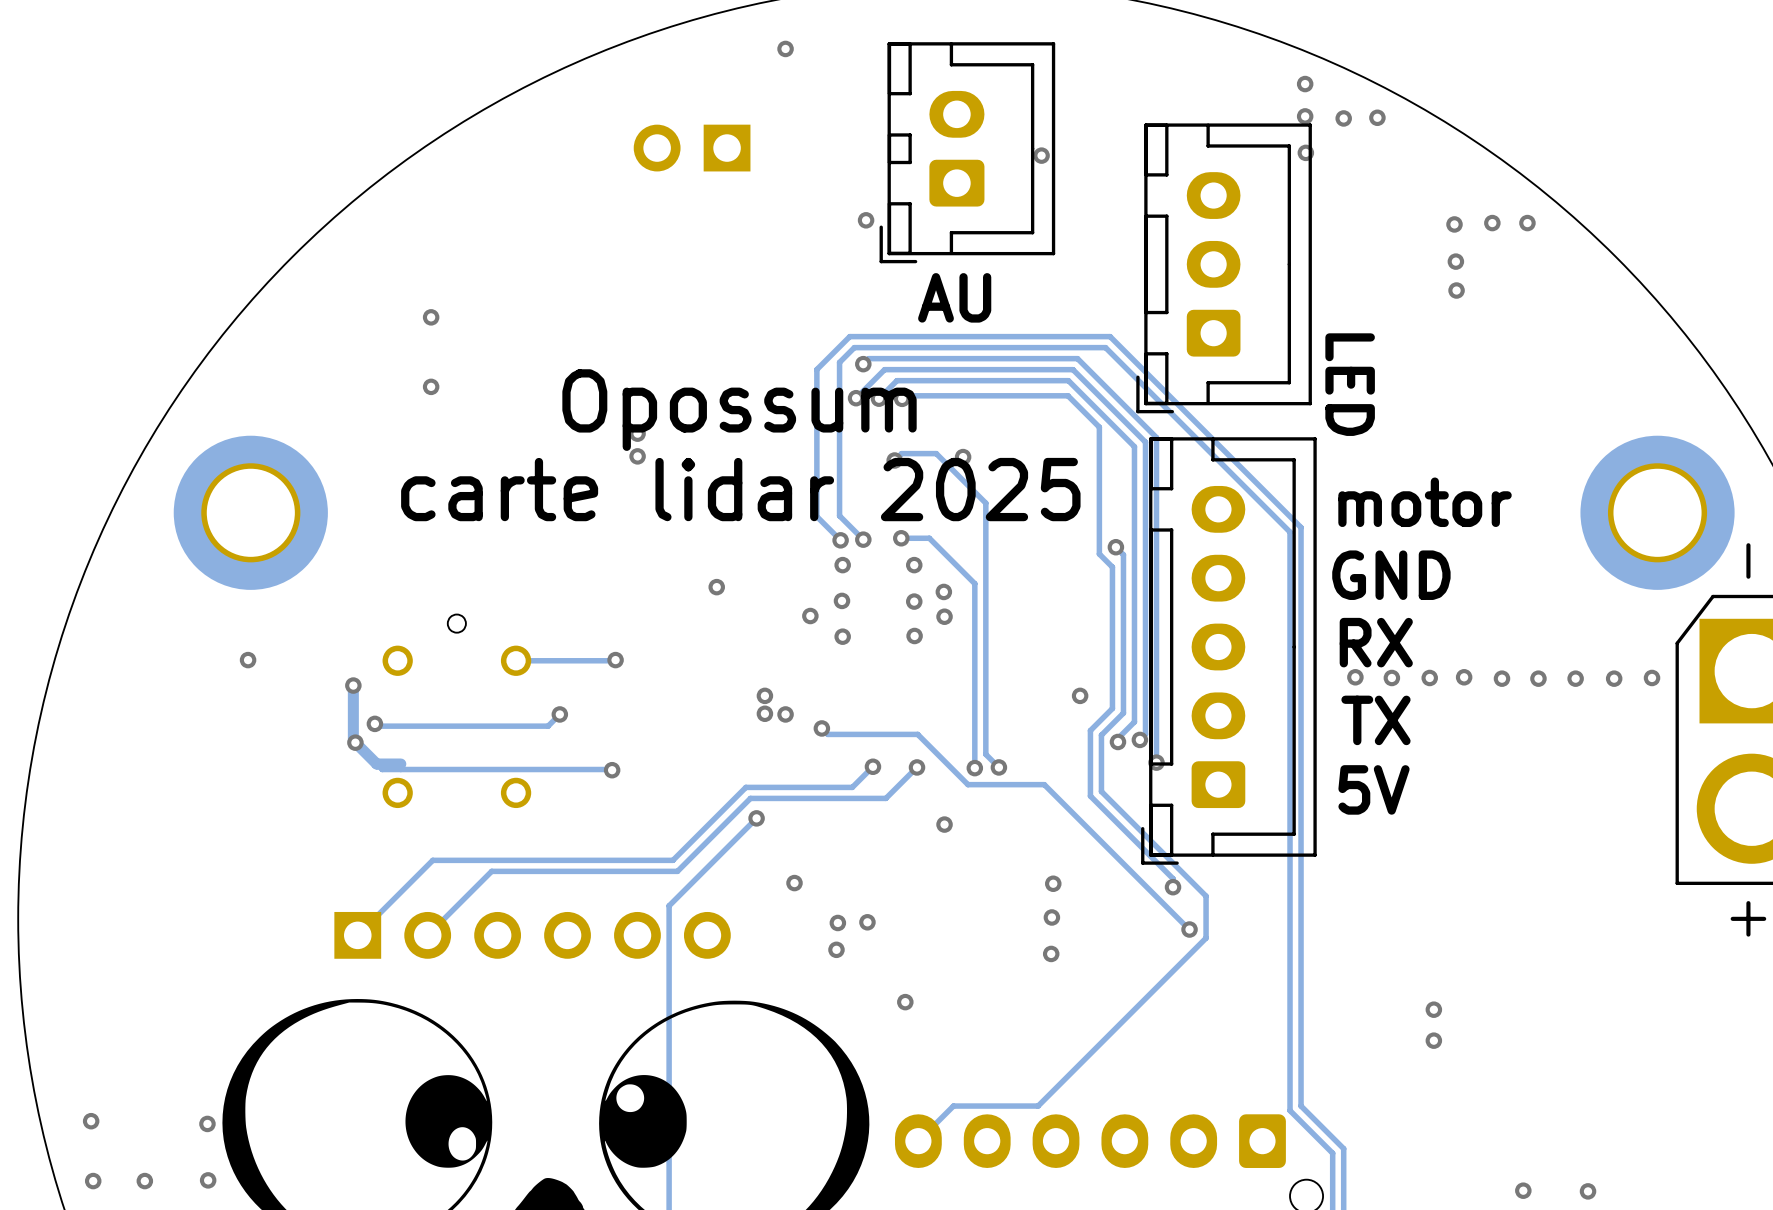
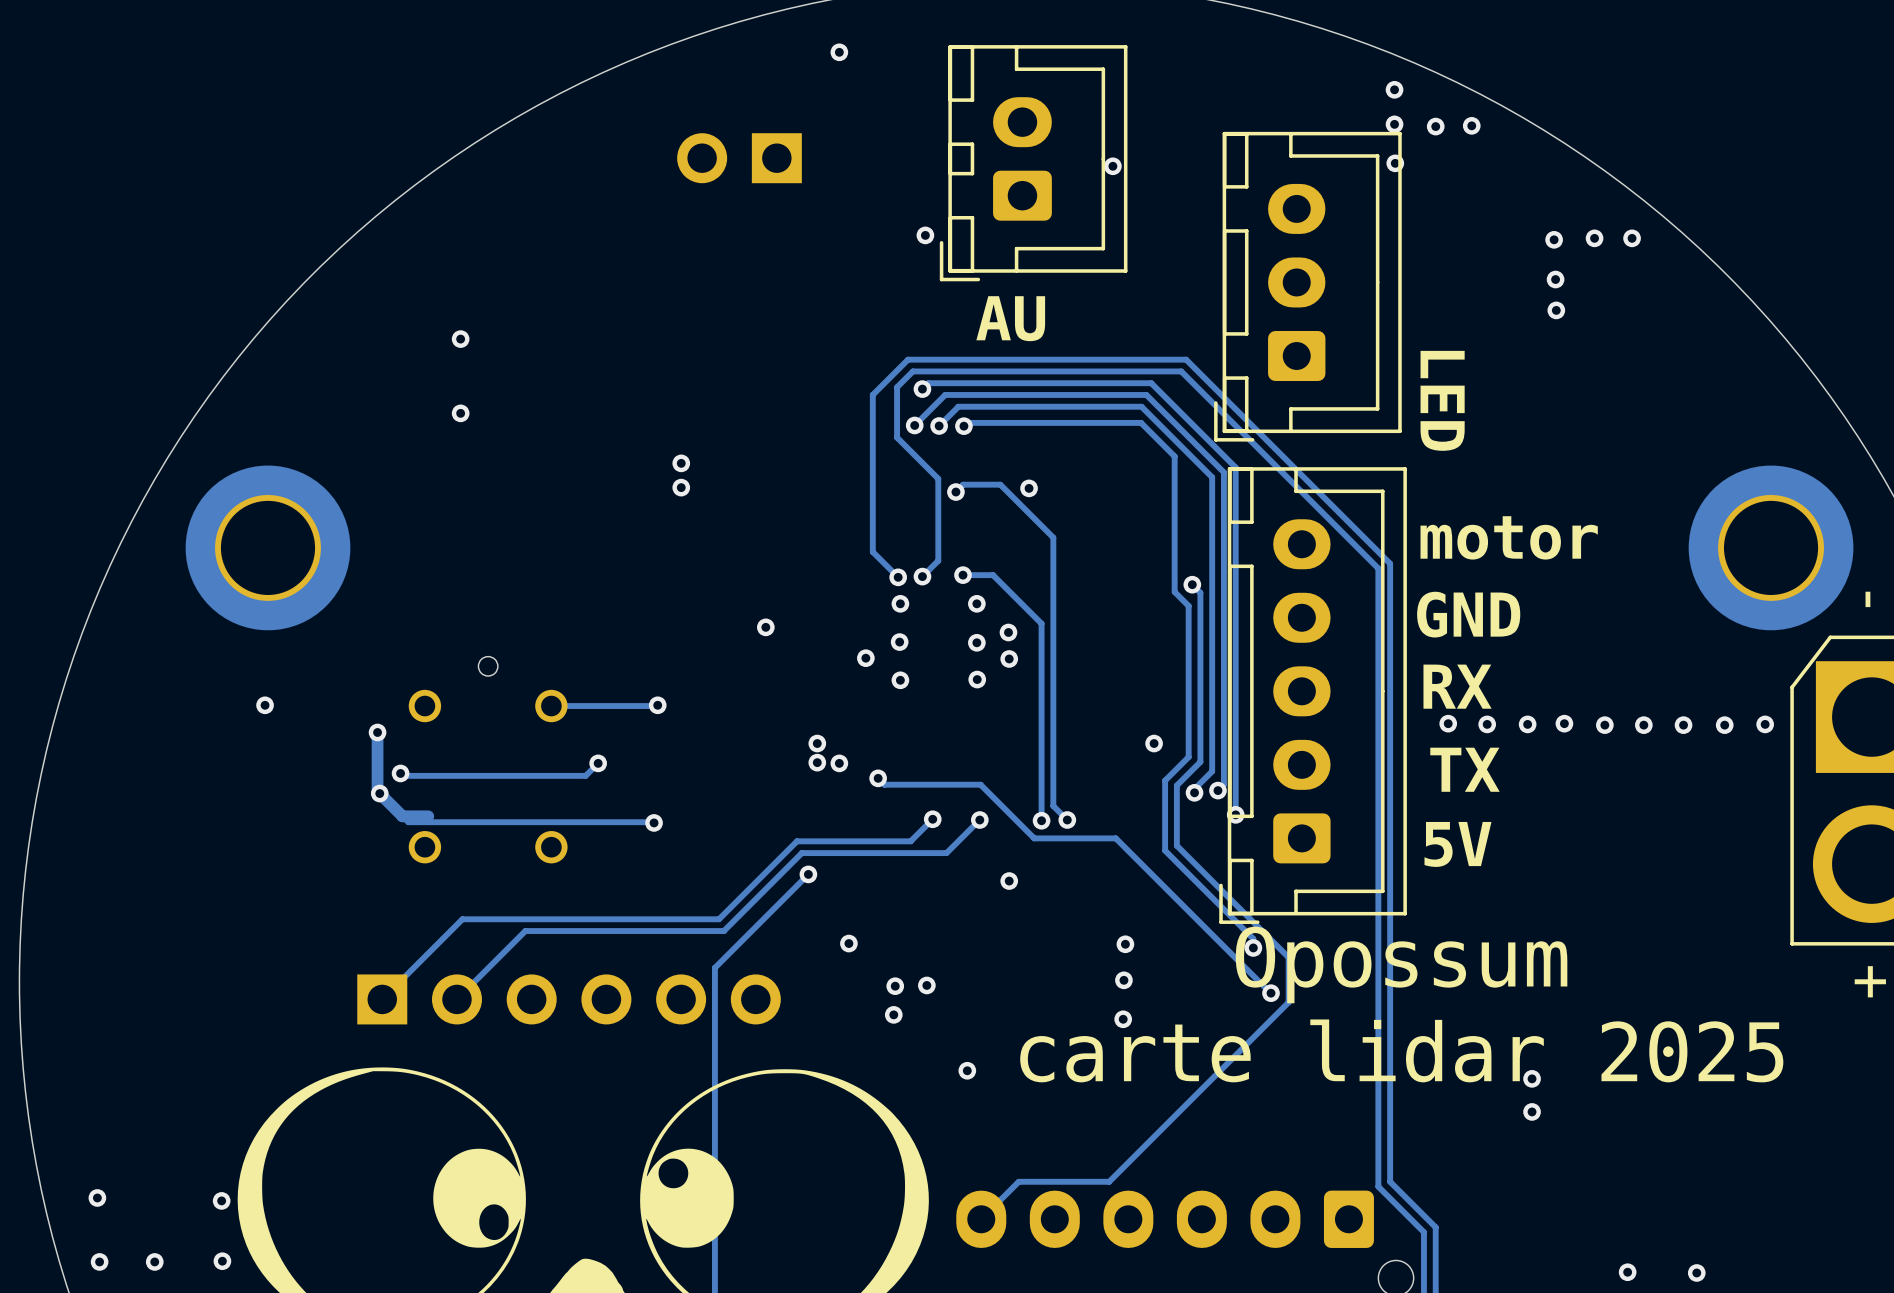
track: (839, 409) (839, 515) (863, 539) -> (897, 437) (938, 478) (938, 560) (922, 576)
text: Opossum (739, 410) -> none
text: carte lidar 2025 (740, 489) -> none
text: none -> Opossum (1401, 964)
text: none -> carte lidar 2025 (1401, 1050)

